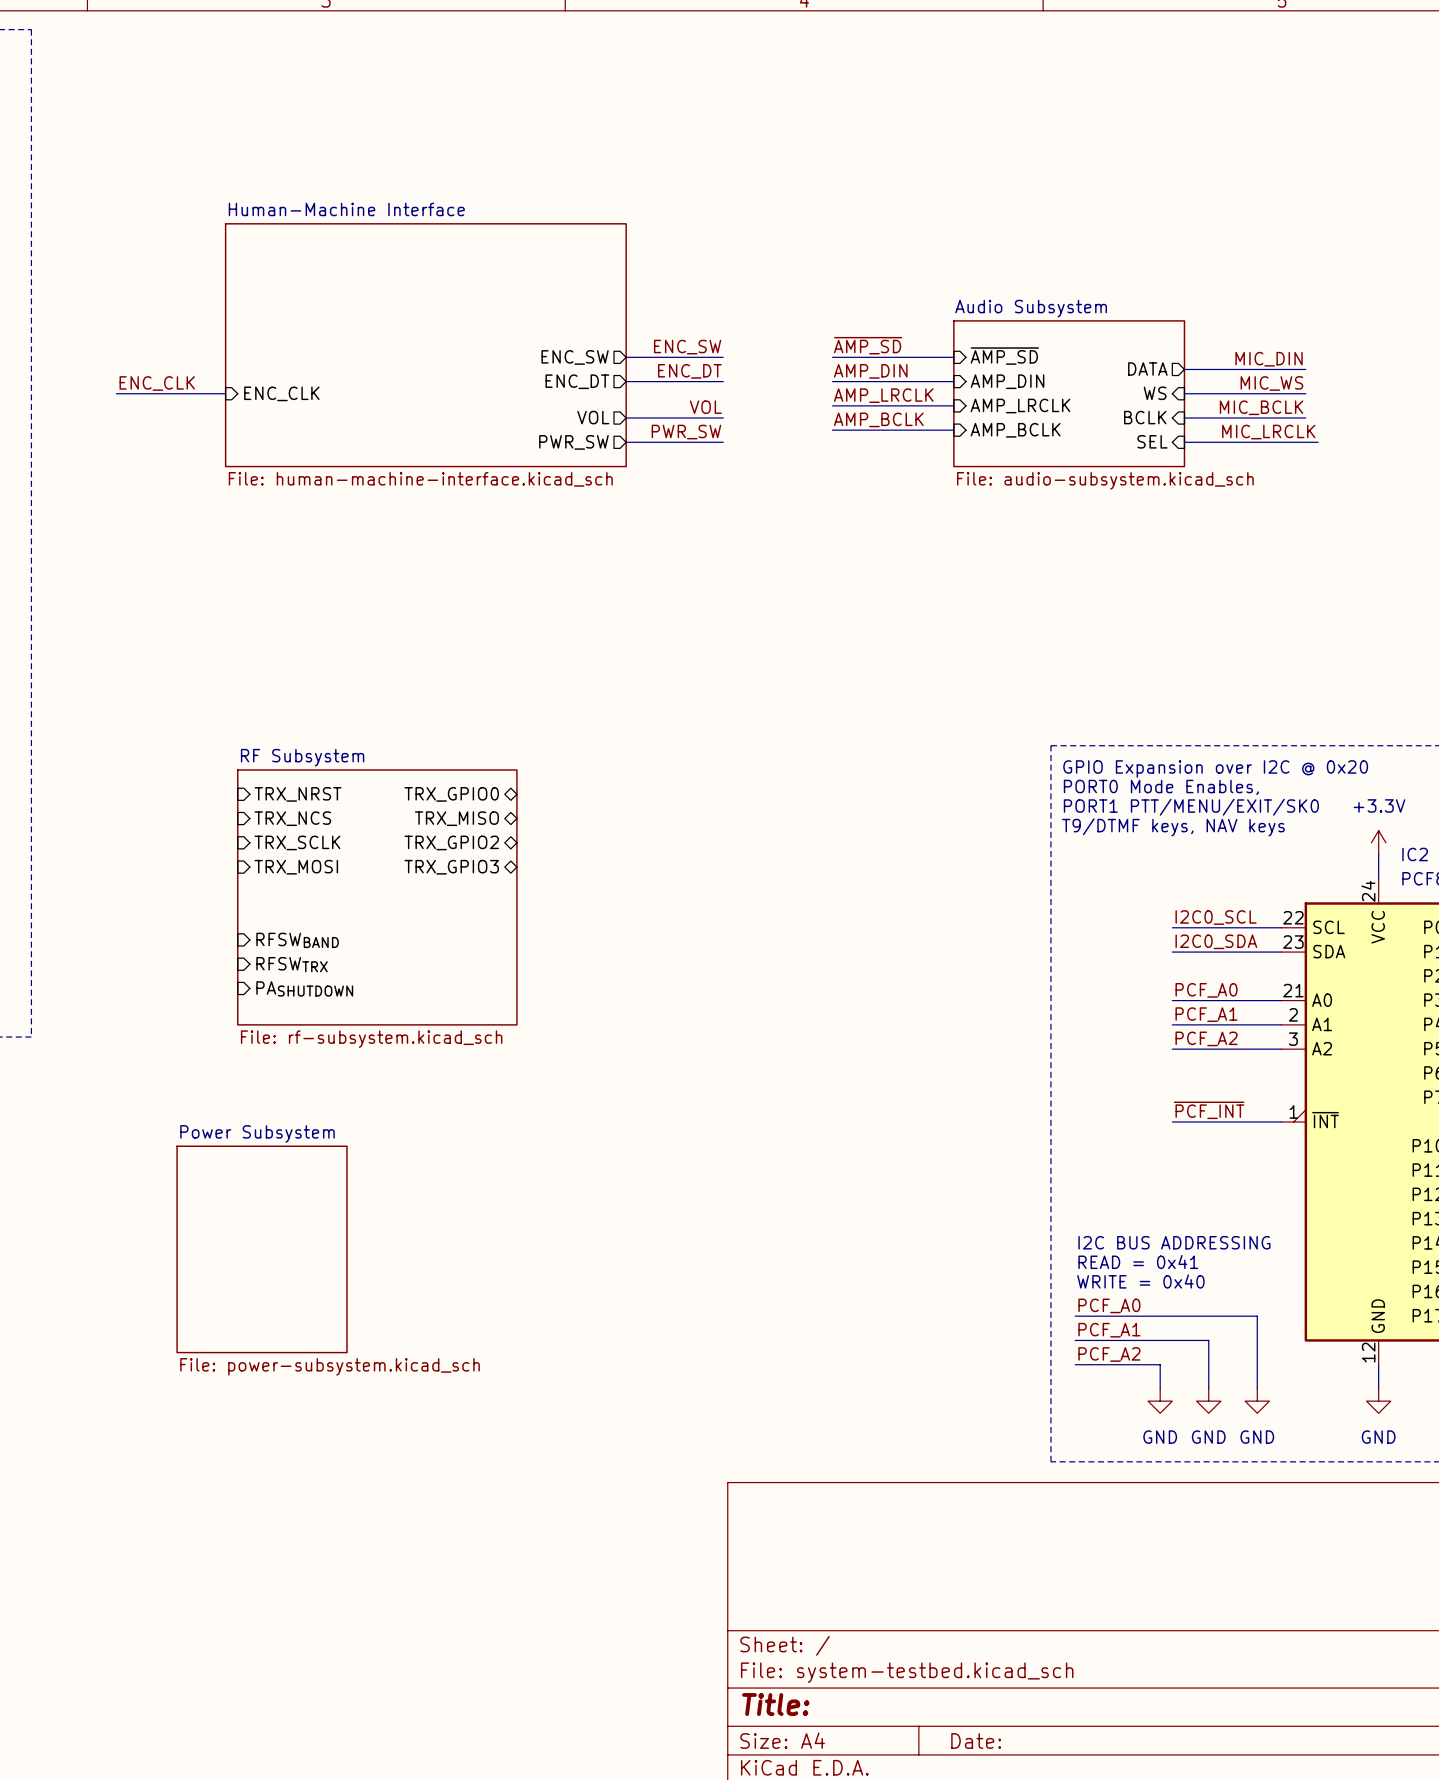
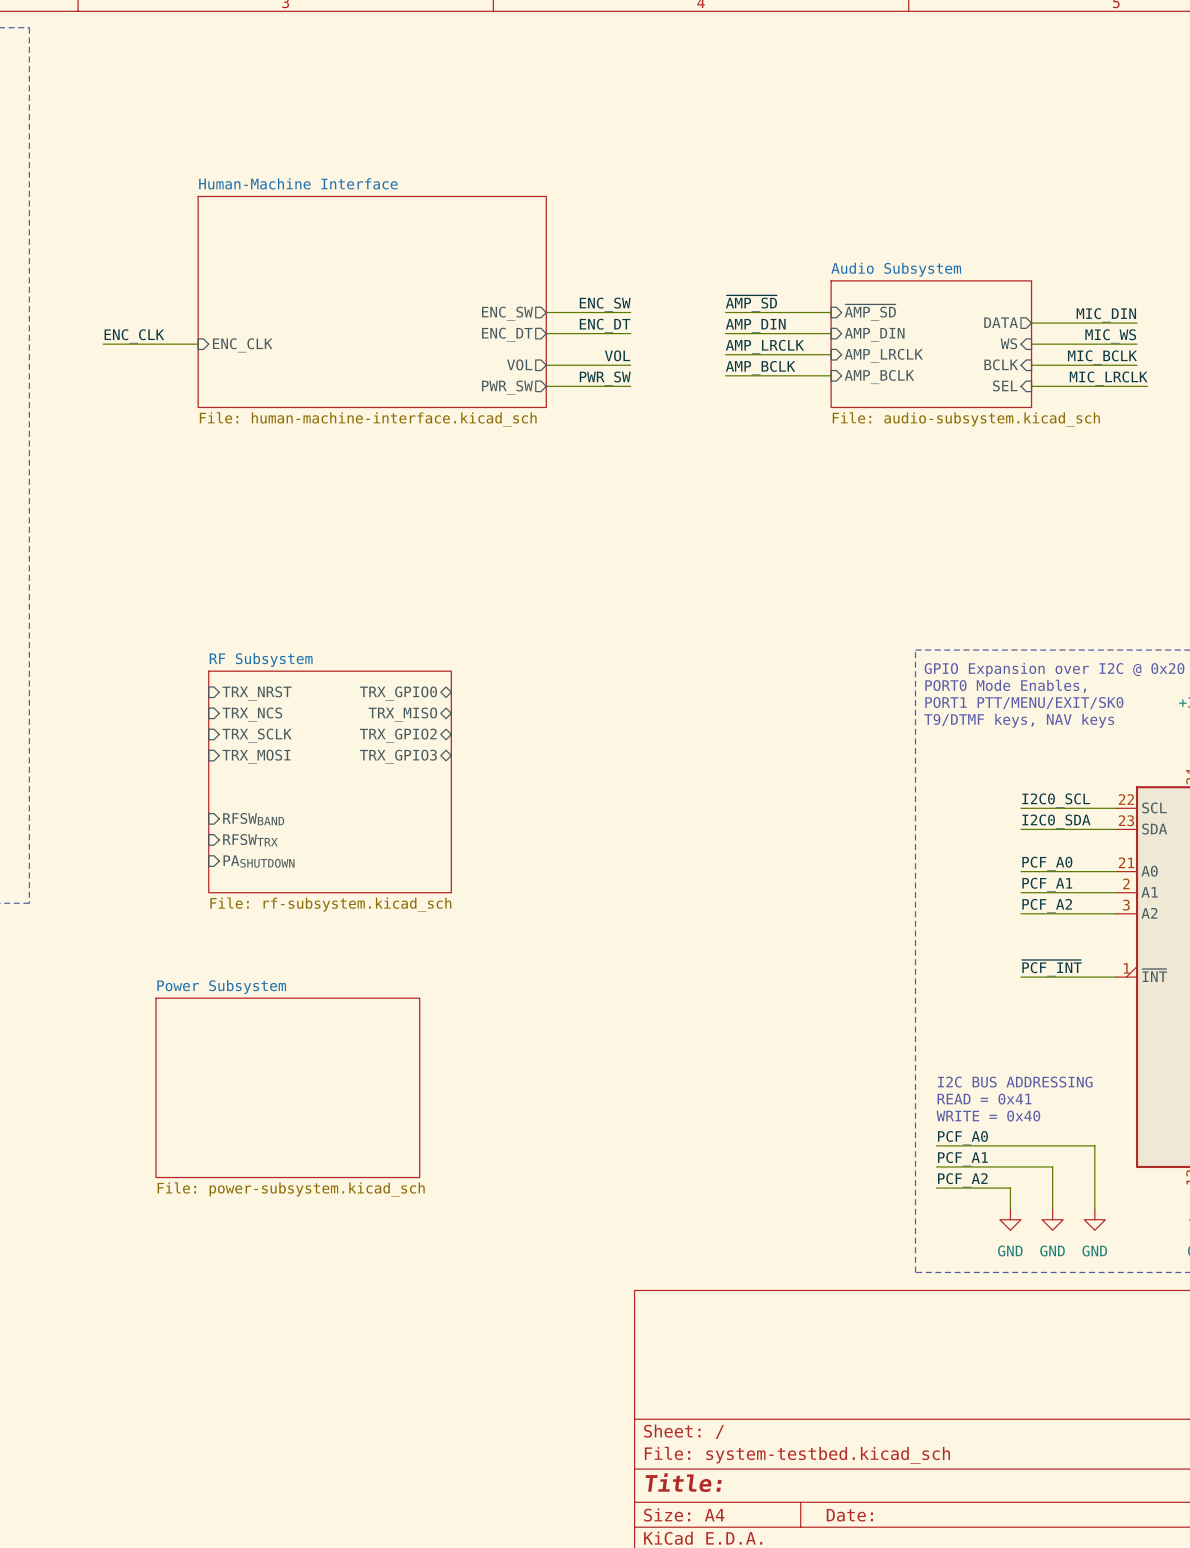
sheet Power Subsystem: File: power-subsystem.kicad_sch (262, 1249) -> none
sheet Power Subsystem: none -> File: power-subsystem.kicad_sch (287, 1087)

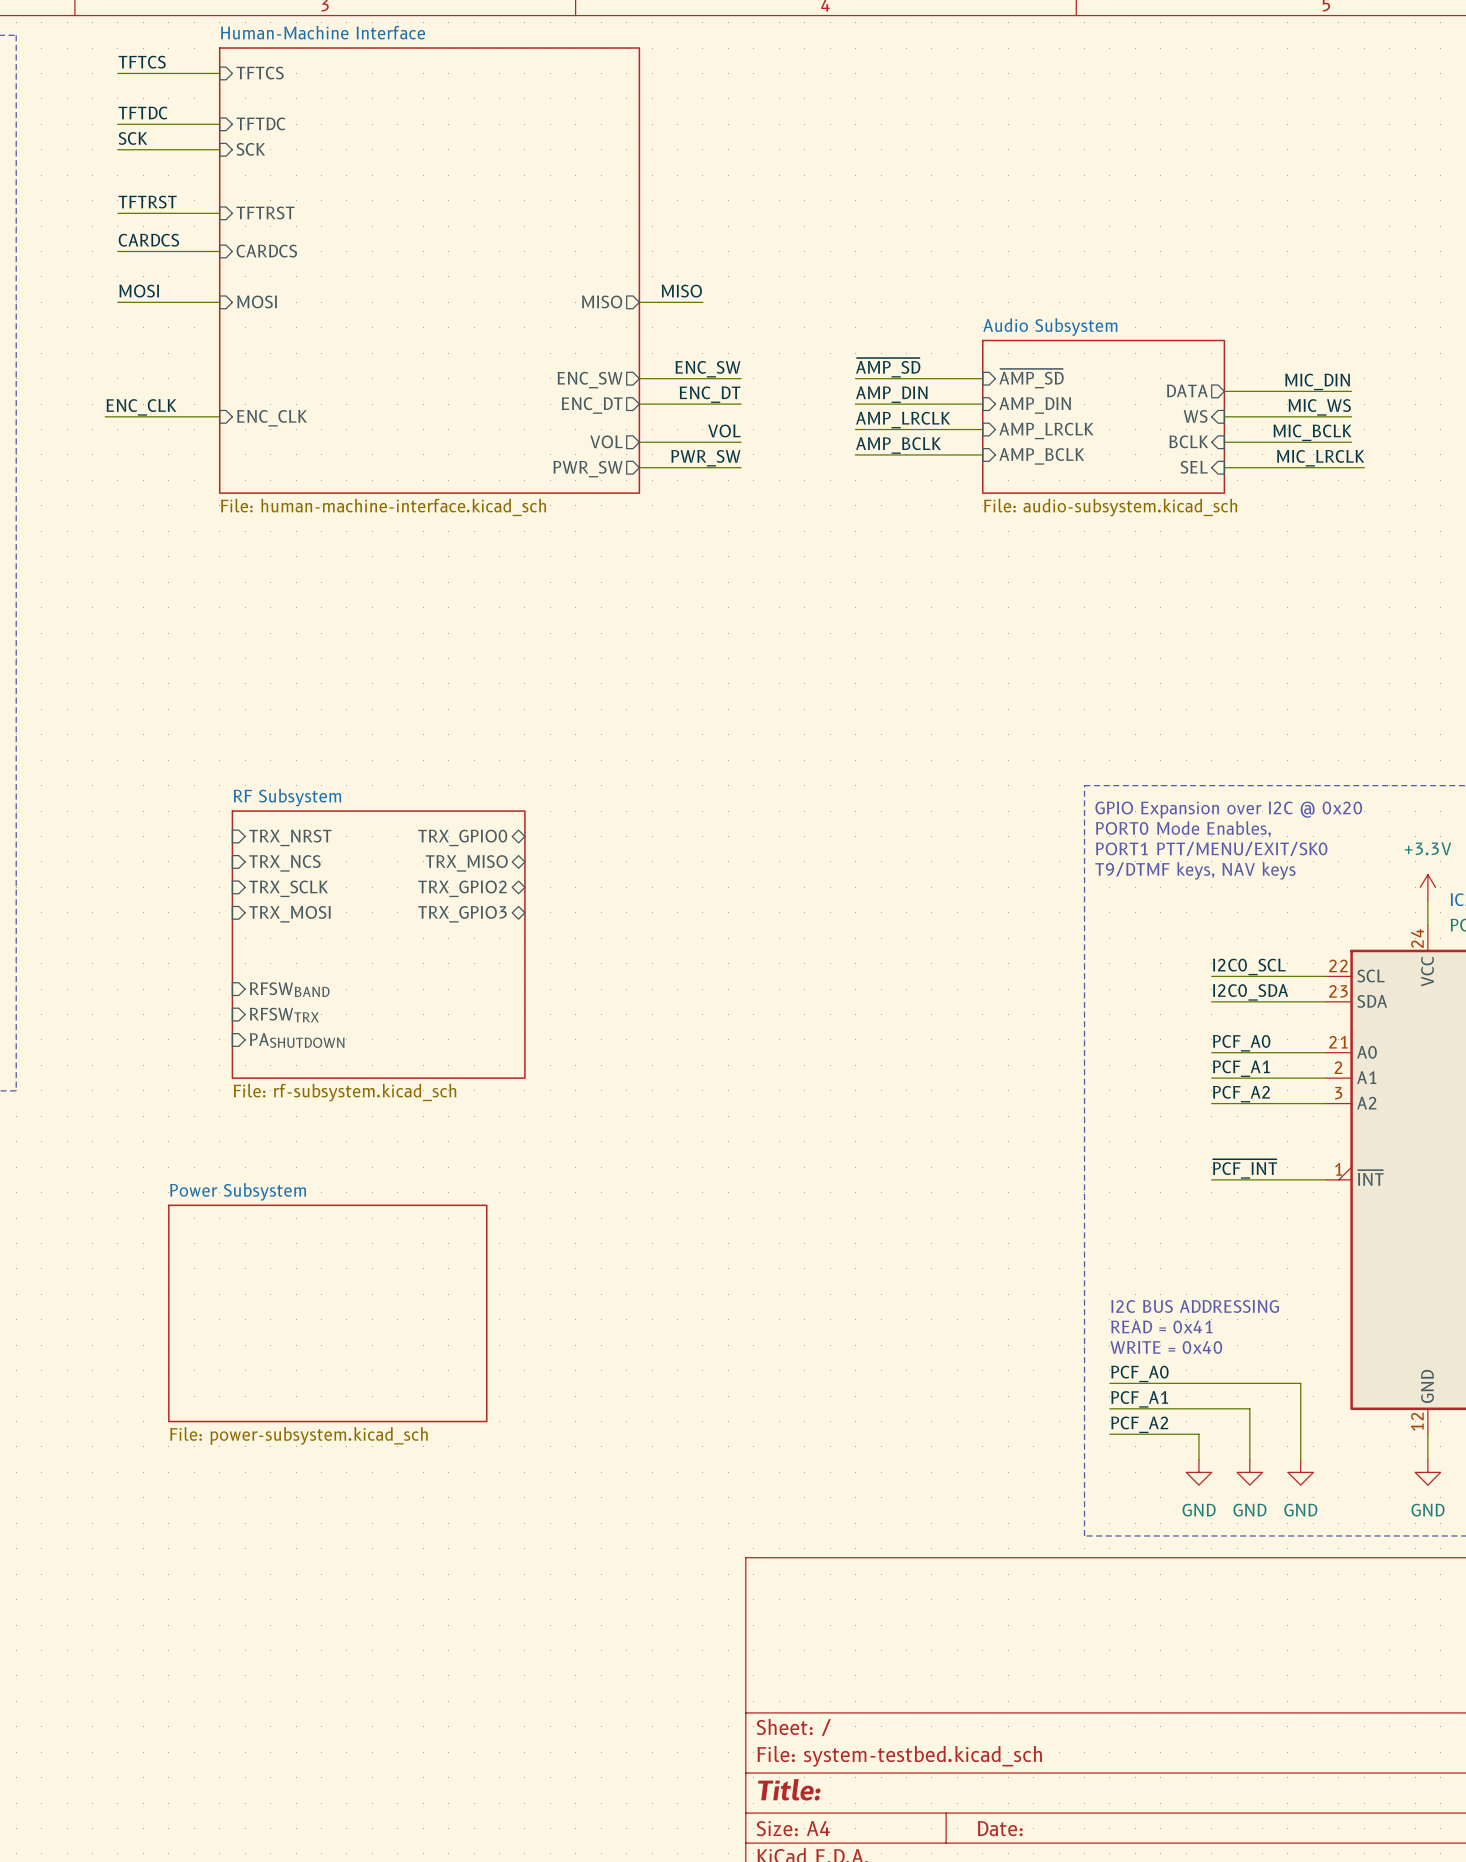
label: none -> TFTCS (142, 62)
sheet pin: none -> TFTCS (260, 73)
wire: none -> (117, 73) (219, 73)
label: none -> TFTDC (143, 113)
wire: none -> (117, 124) (219, 124)
sheet pin: none -> TFTDC (260, 123)
label: none -> SCK (132, 138)
wire: none -> (117, 149) (219, 149)
sheet pin: none -> SCK (250, 149)
label: none -> TFTRST (147, 202)
sheet pin: none -> TFTRST (265, 212)
wire: none -> (117, 213) (219, 213)
label: none -> CARDCS (148, 240)
sheet pin: none -> CARDCS (266, 251)
wire: none -> (117, 251) (219, 251)
sheet Human-Machine Interface: none -> File: human-machine-interface.kicad_sch (429, 270)
label: none -> MOSI (139, 291)
label: none -> MISO (681, 291)
sheet pin: none -> MOSI (257, 301)
sheet pin: none -> MISO (602, 301)
wire: none -> (117, 302) (219, 302)
wire: none -> (639, 302) (702, 302)
sheet Human-Machine Interface: File: human-machine-interface.kicad_sch (372, 301) -> none

